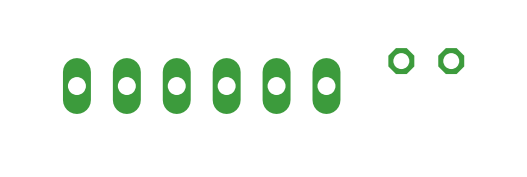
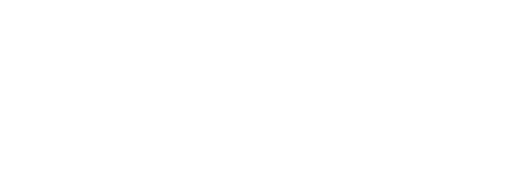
part: (426, 61) -> none
part: (201, 86) -> none

